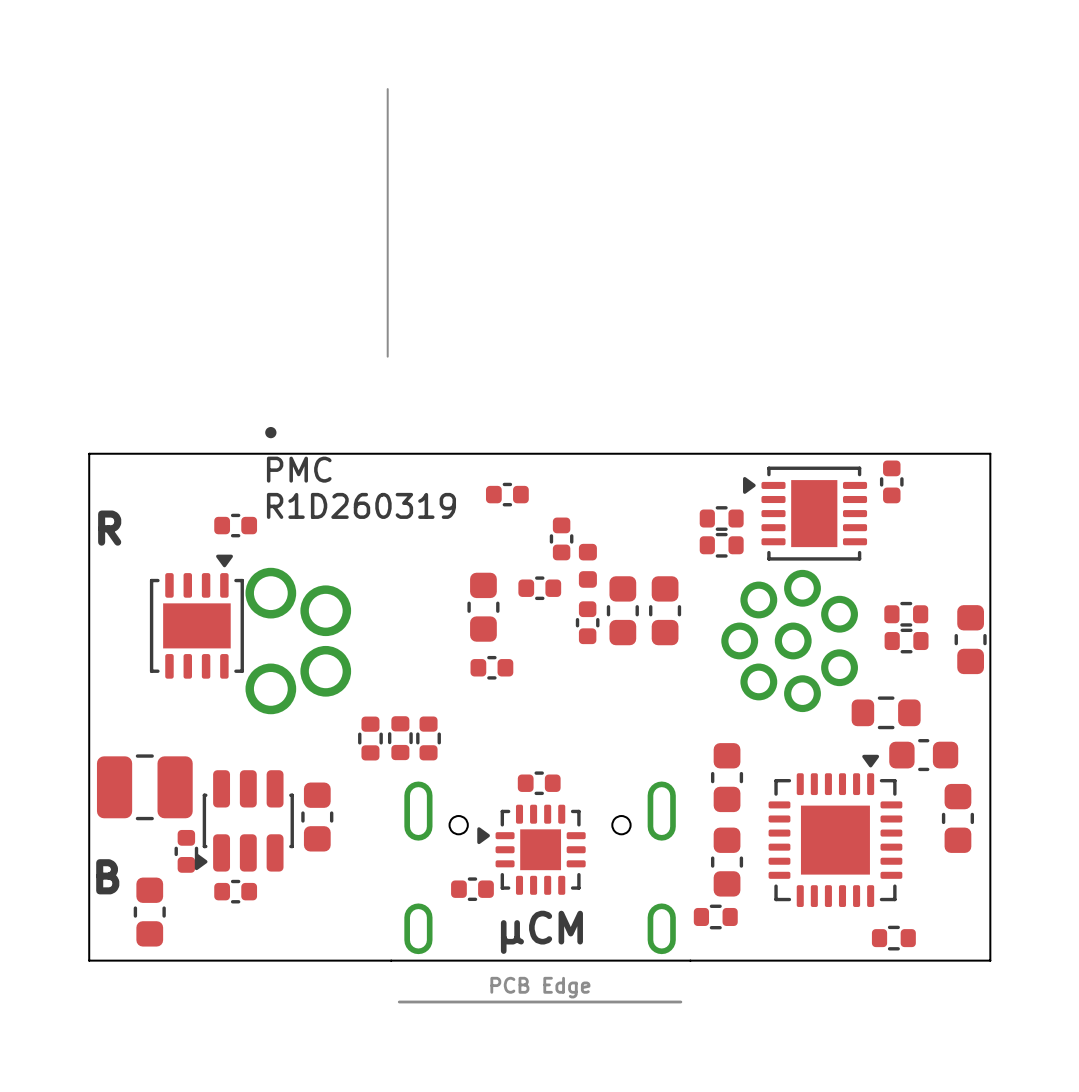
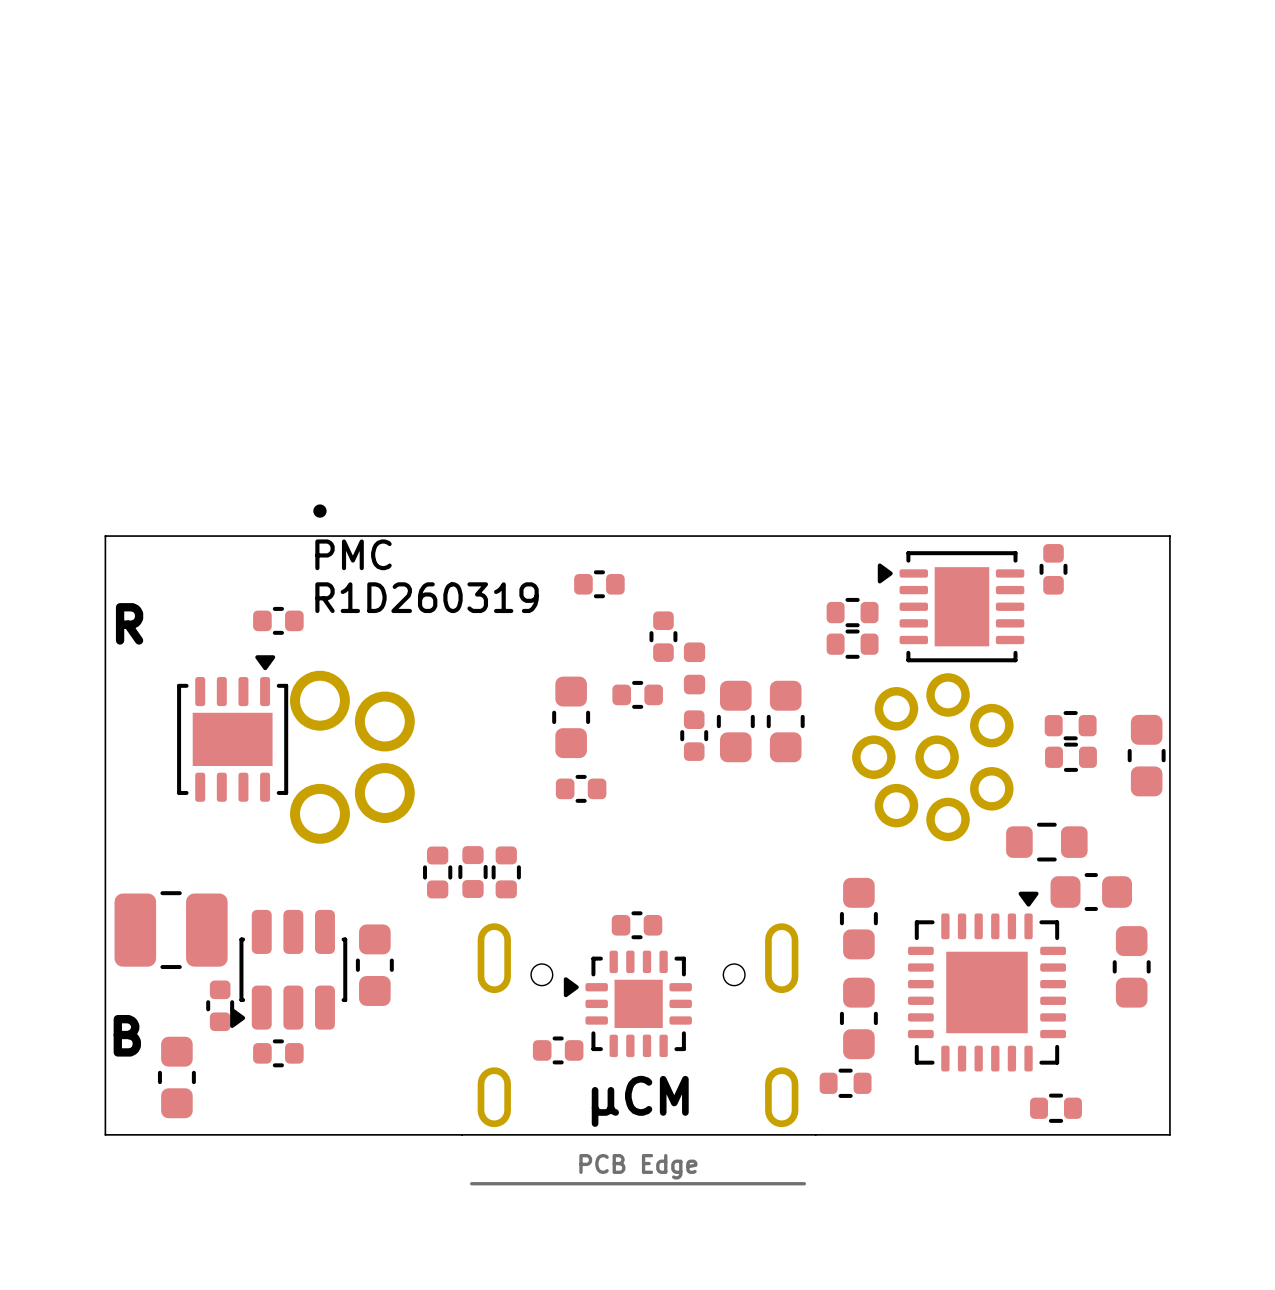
line: (387, 89) (387, 356) -> none

